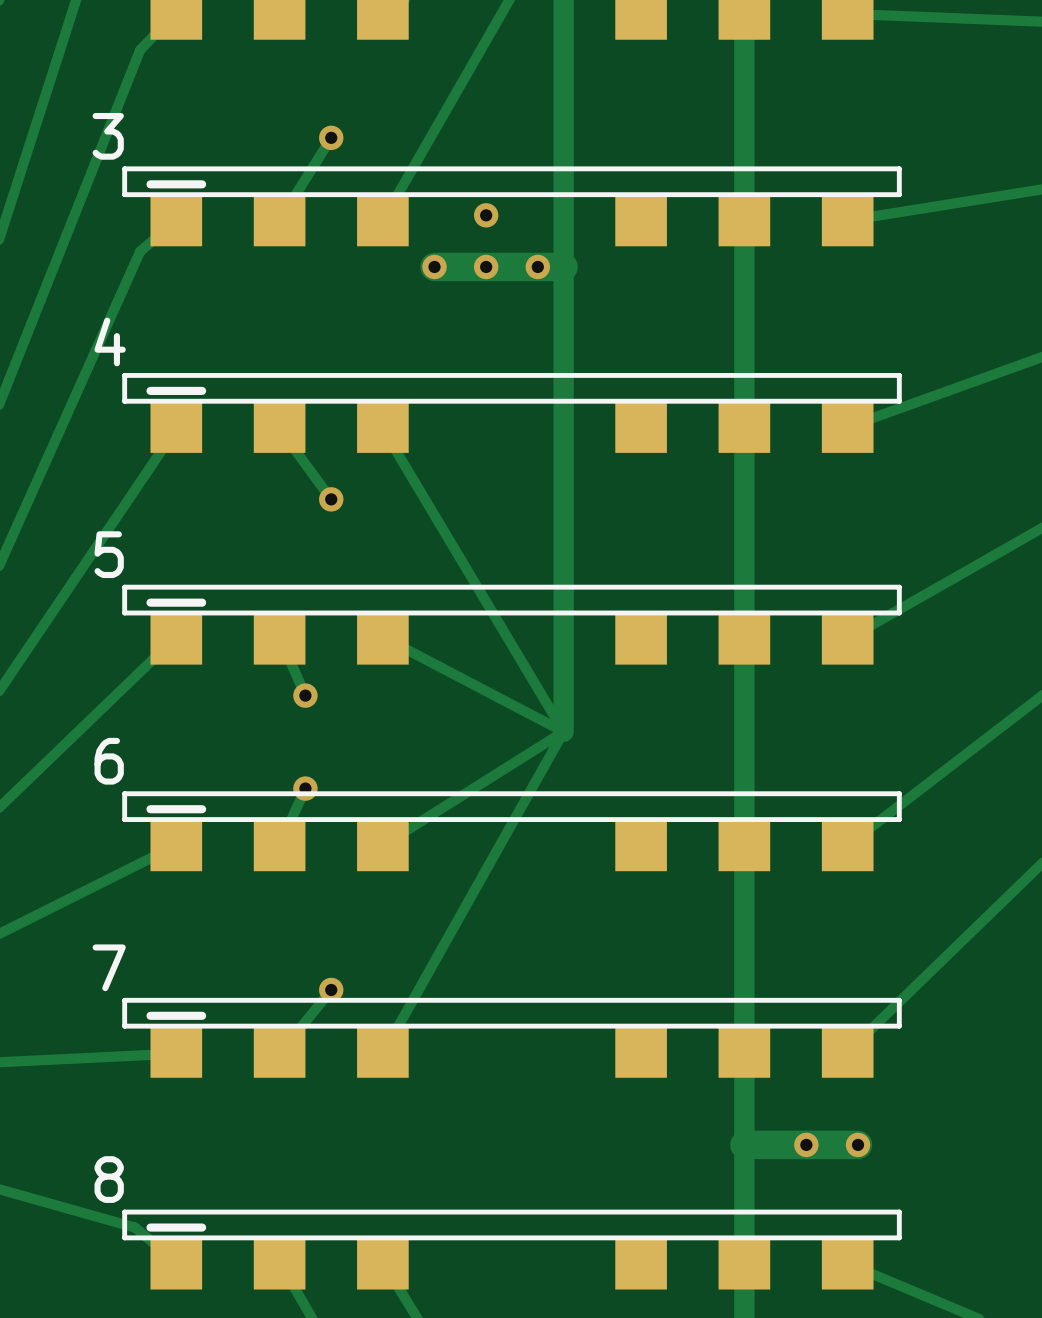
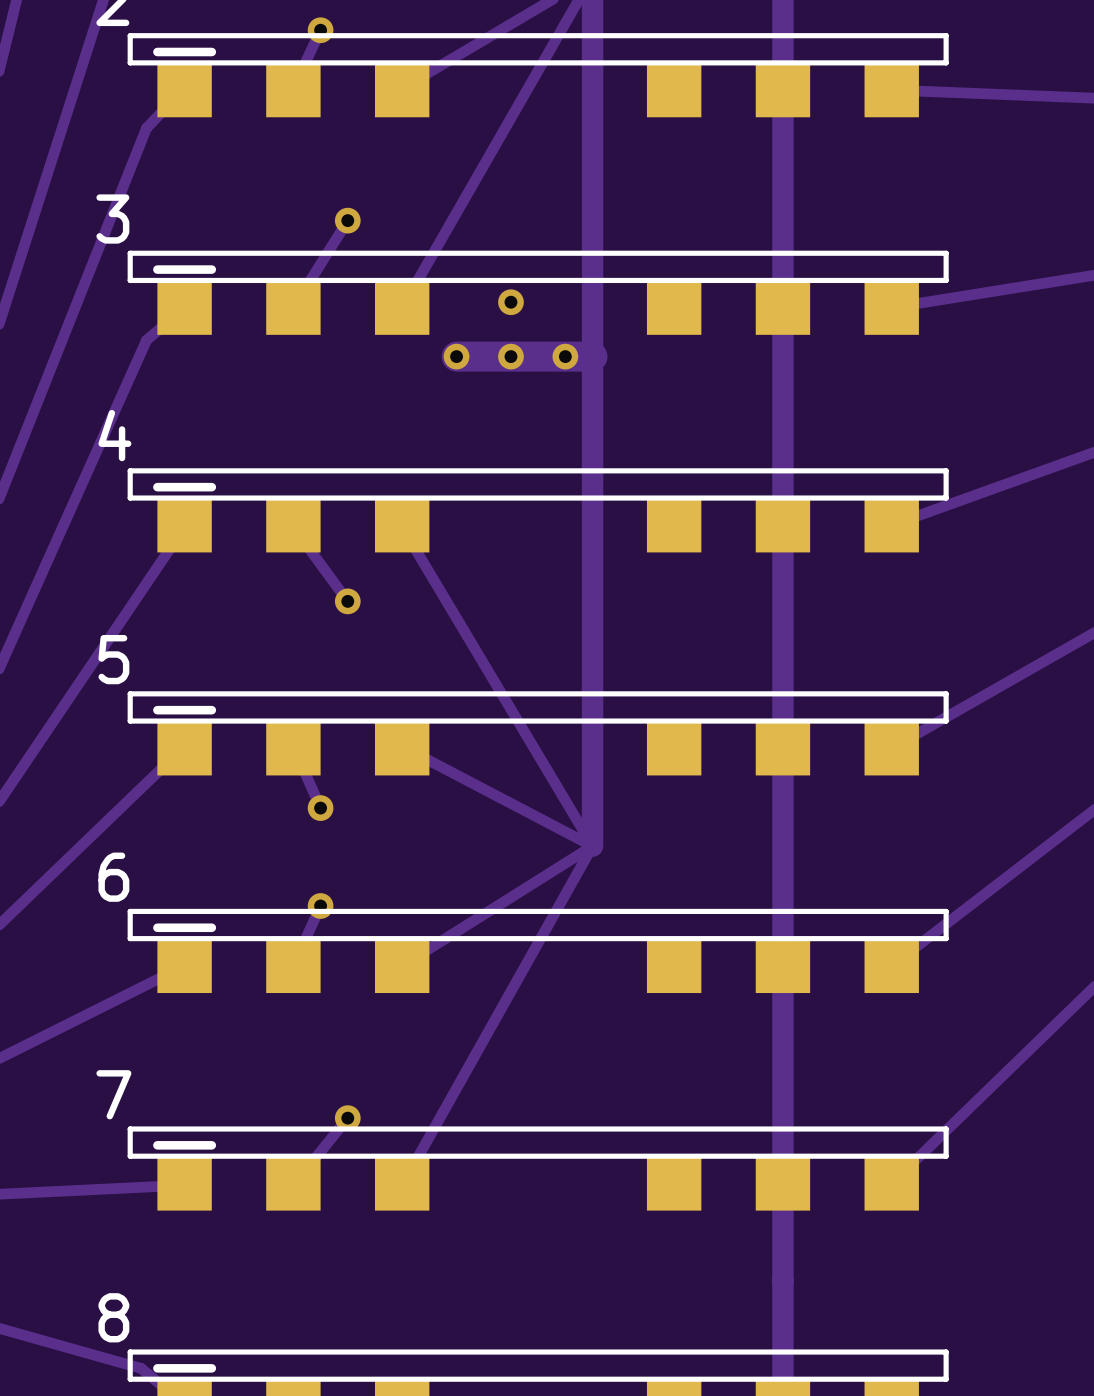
track: (744, 1144) (858, 1144) -> none
via: (806, 1144) -> none
via: (858, 1144) -> none

